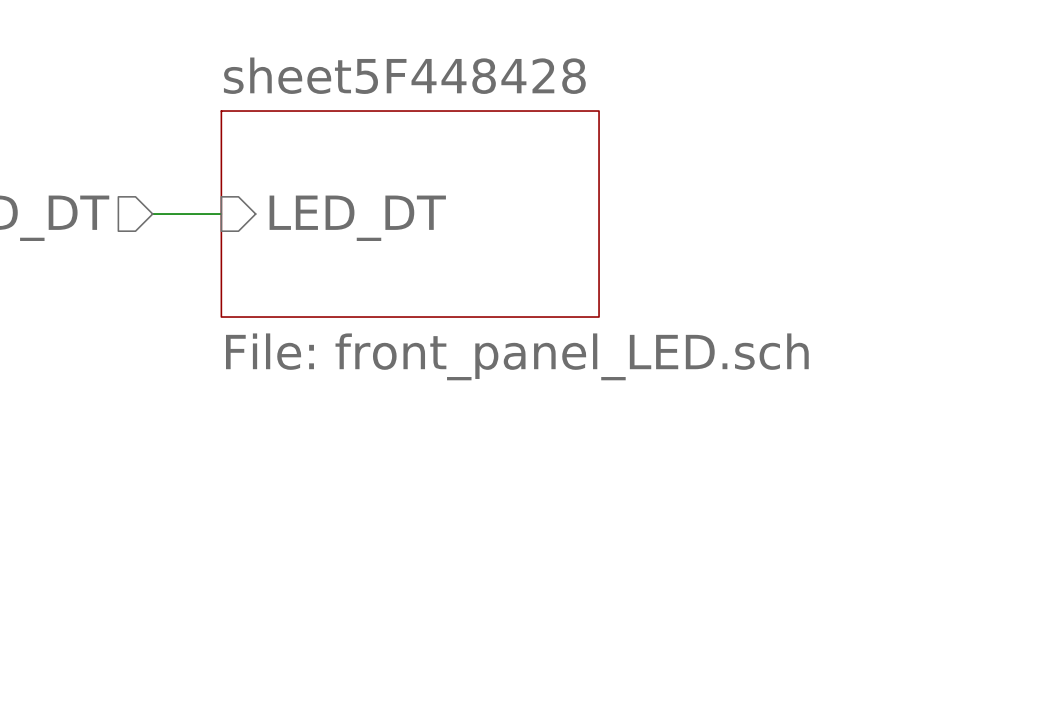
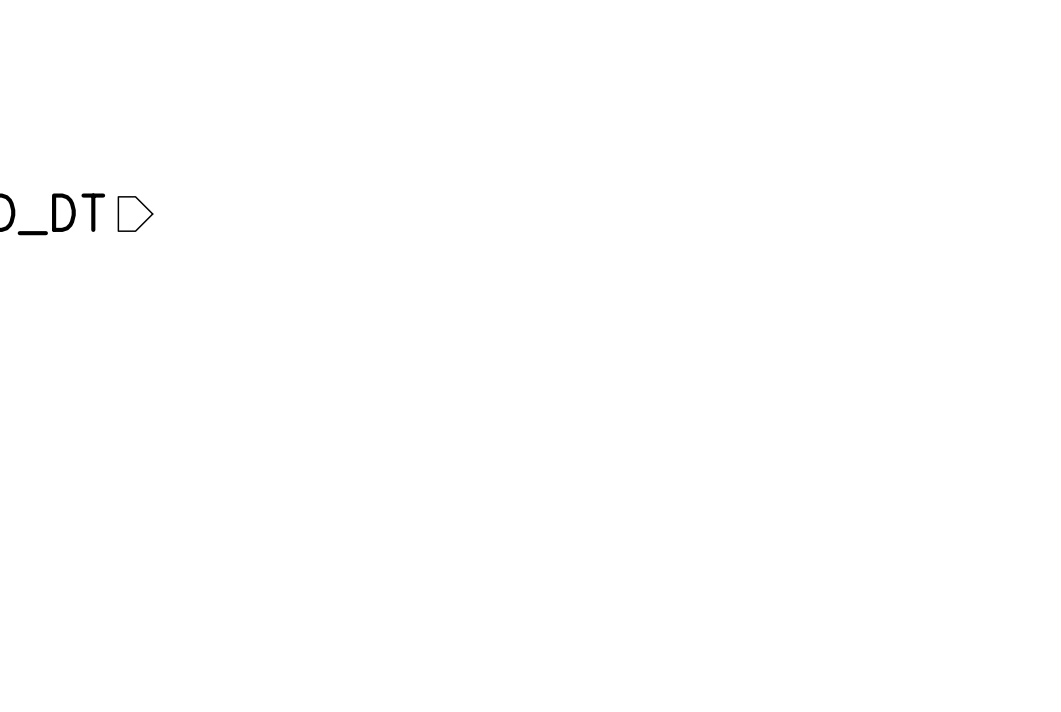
wire: (152, 214) (221, 214) -> none
sheet sheet5F448428: File: front_panel_LED.sch (410, 214) -> none
sheet pin: LED_DT (357, 218) -> none

